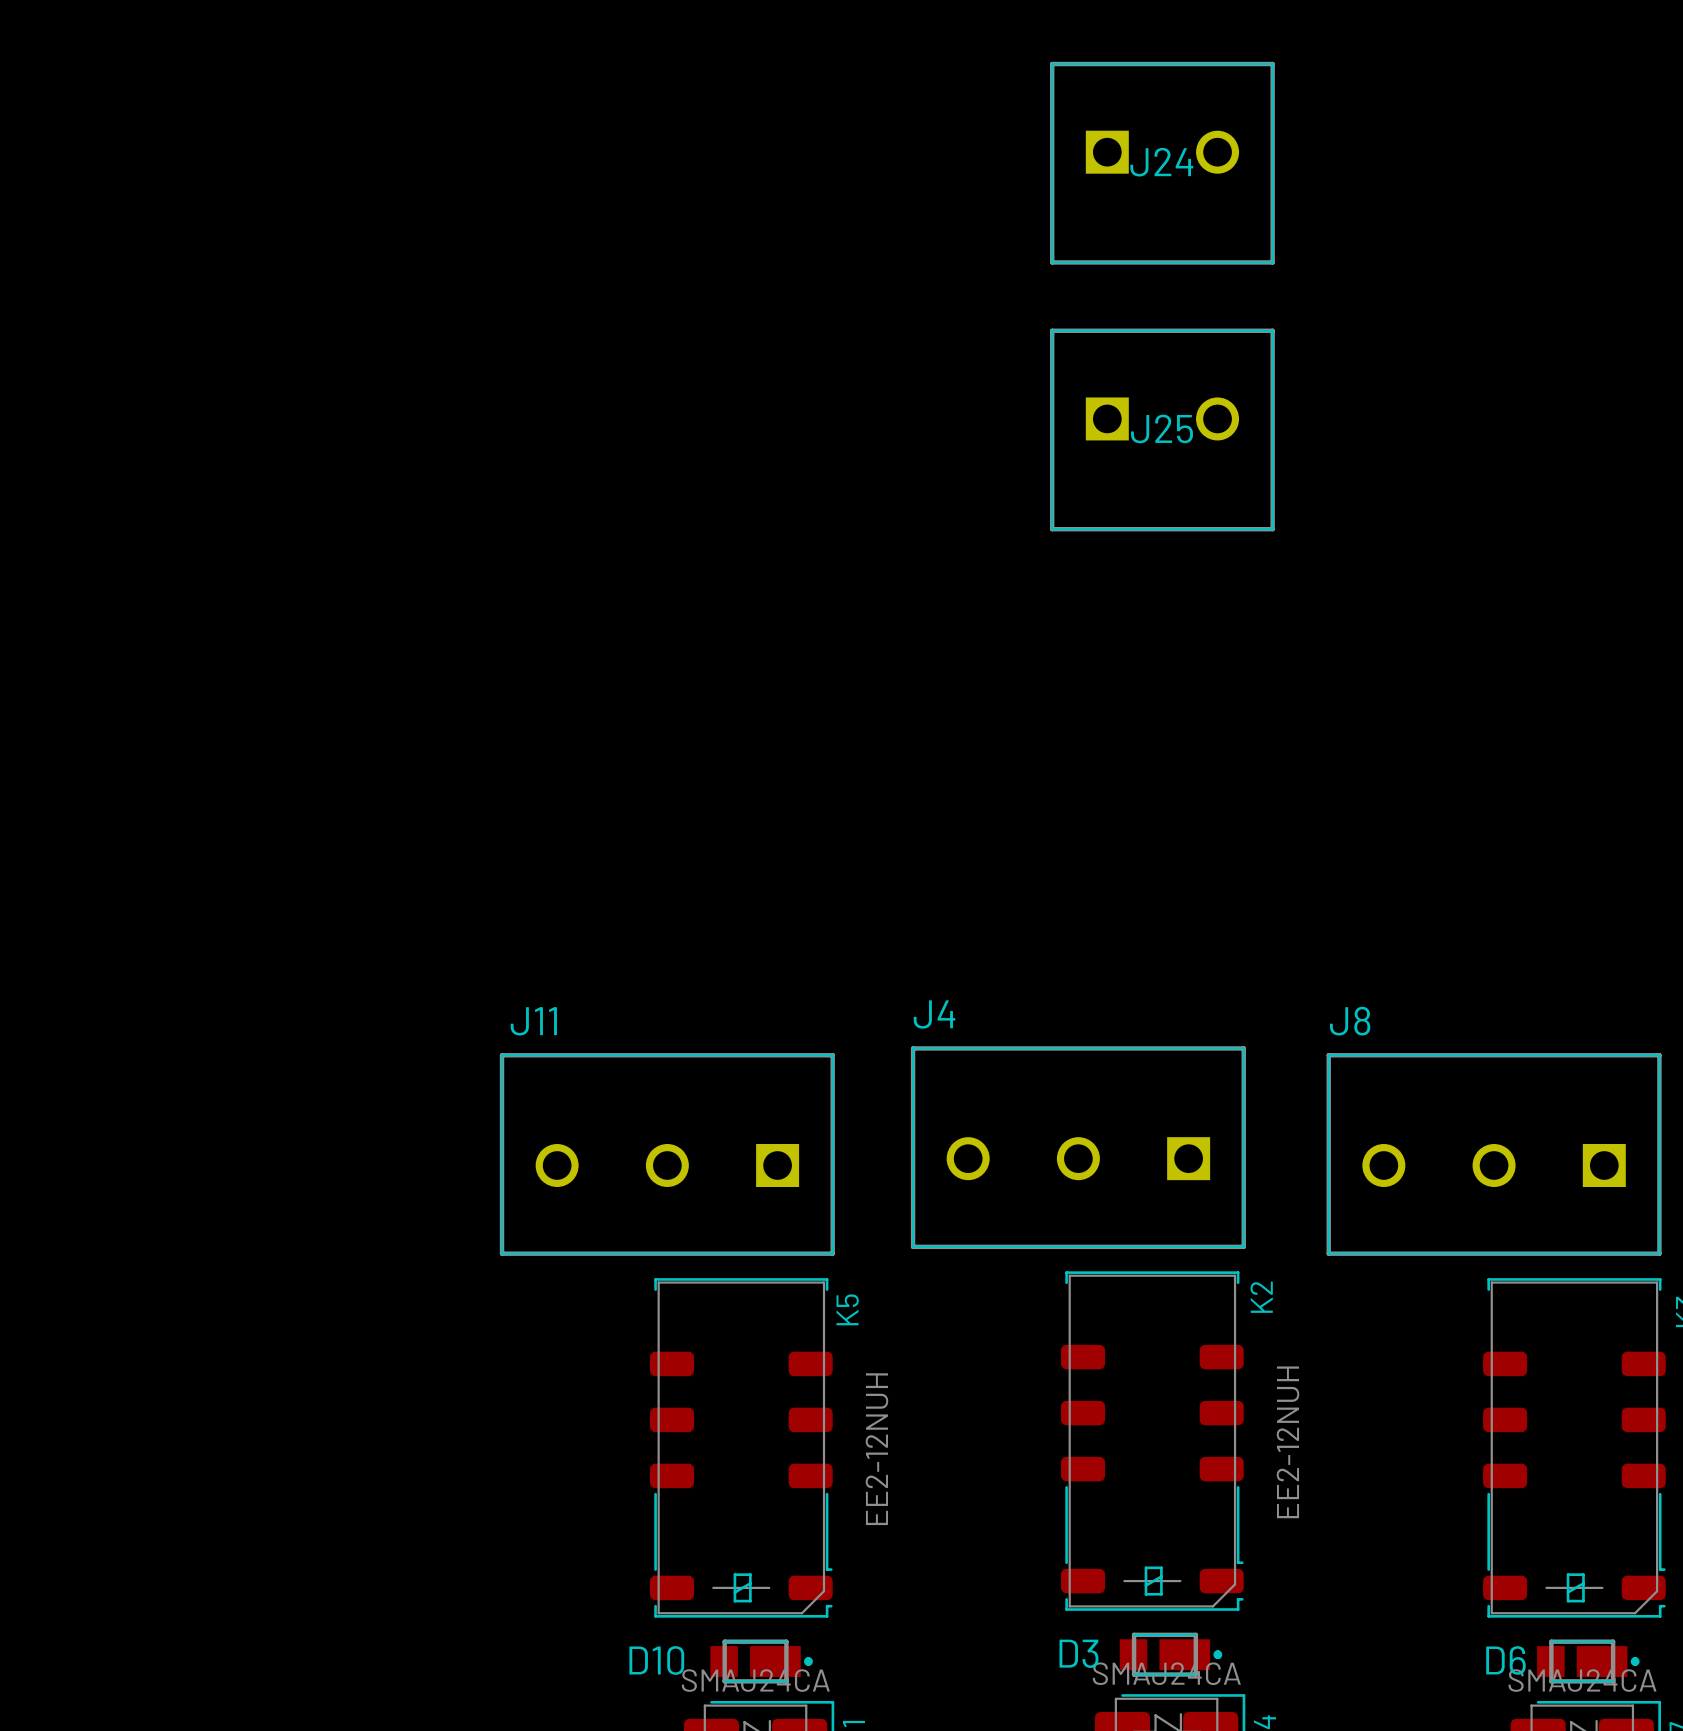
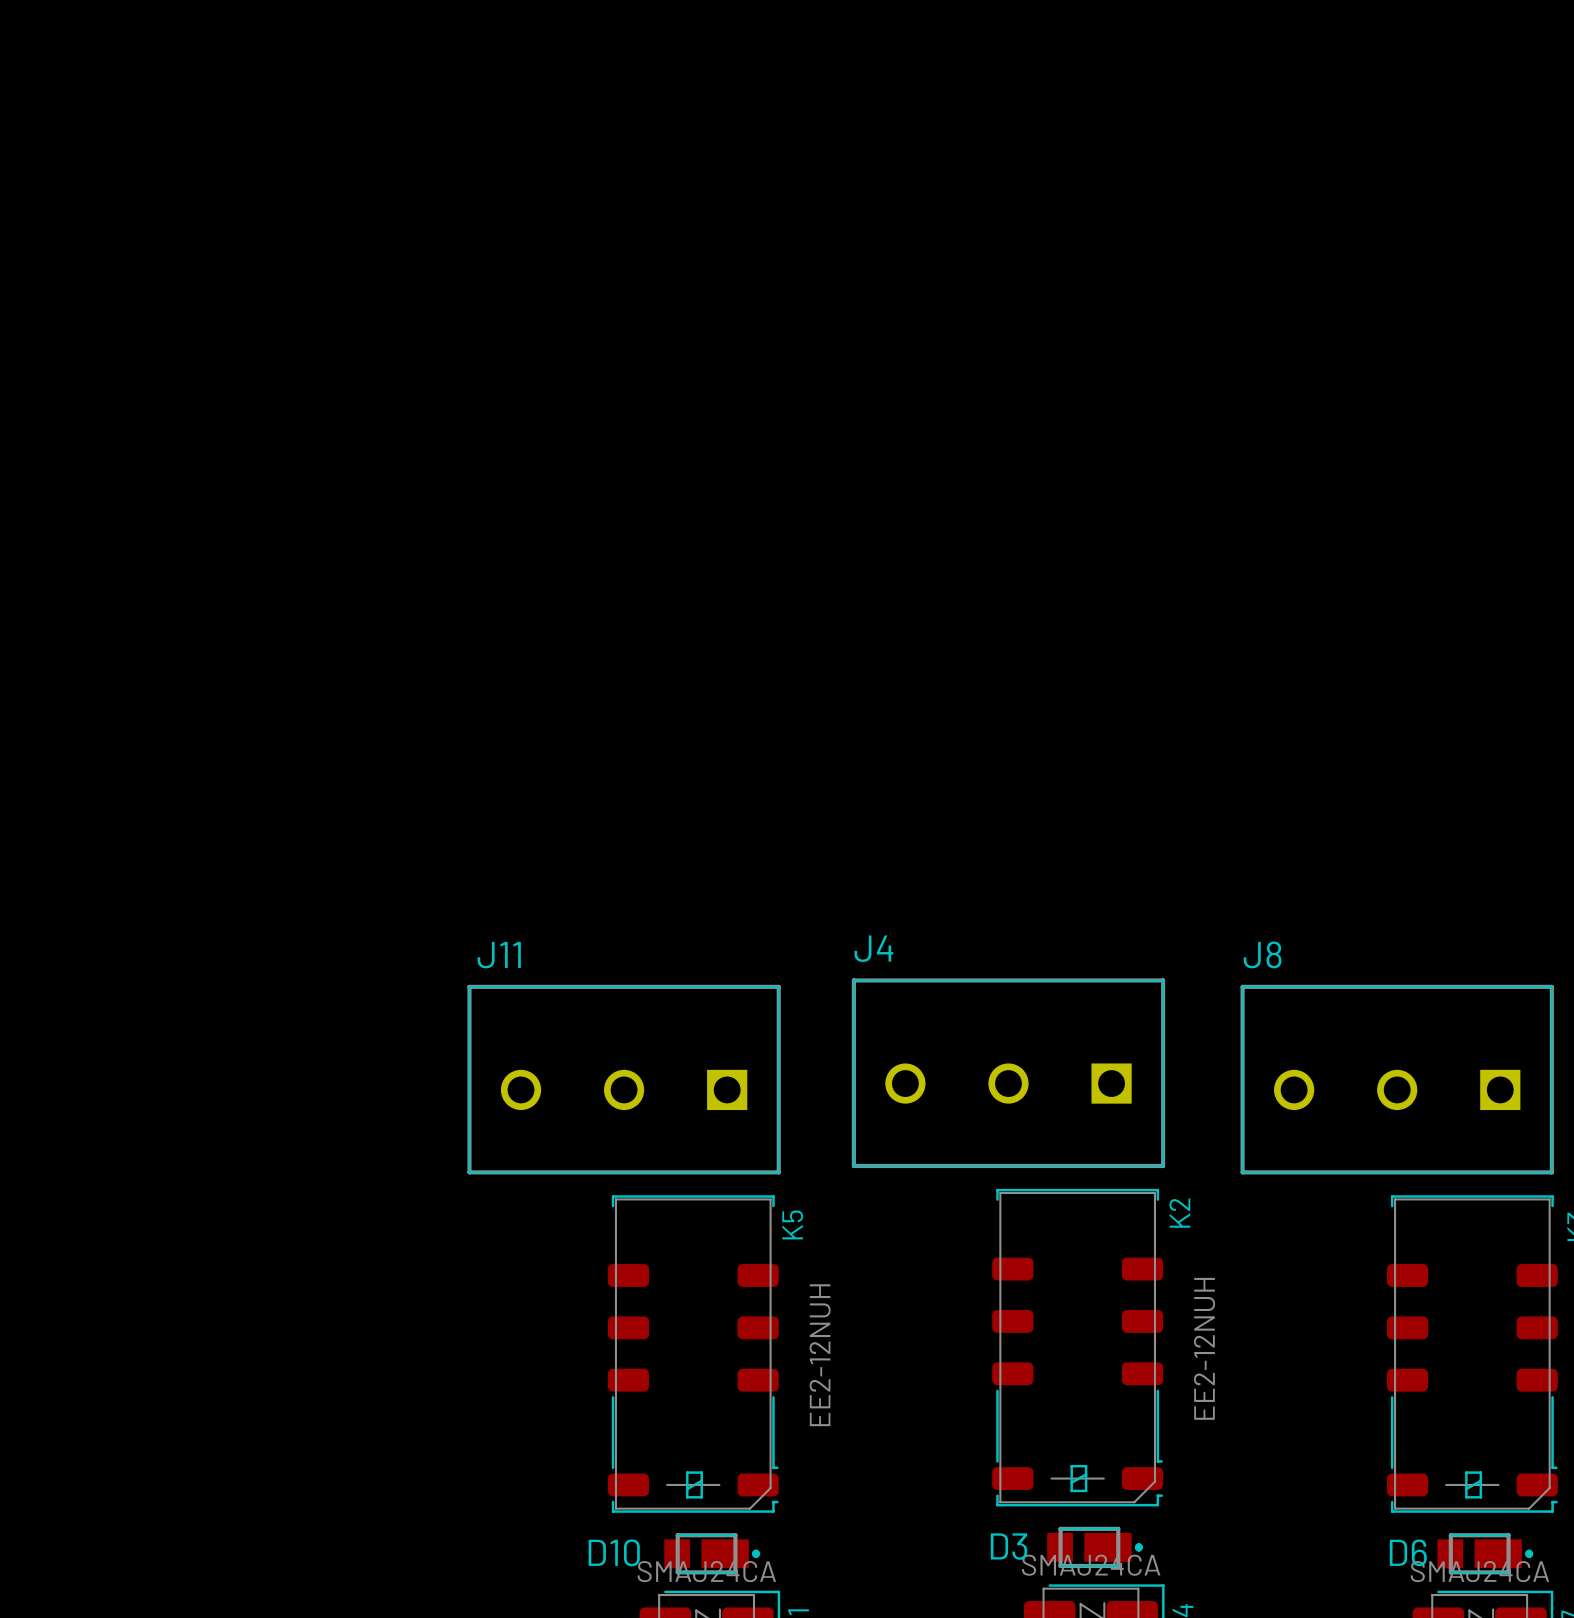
J24: (1162, 163) -> none
J25: (1162, 429) -> none

